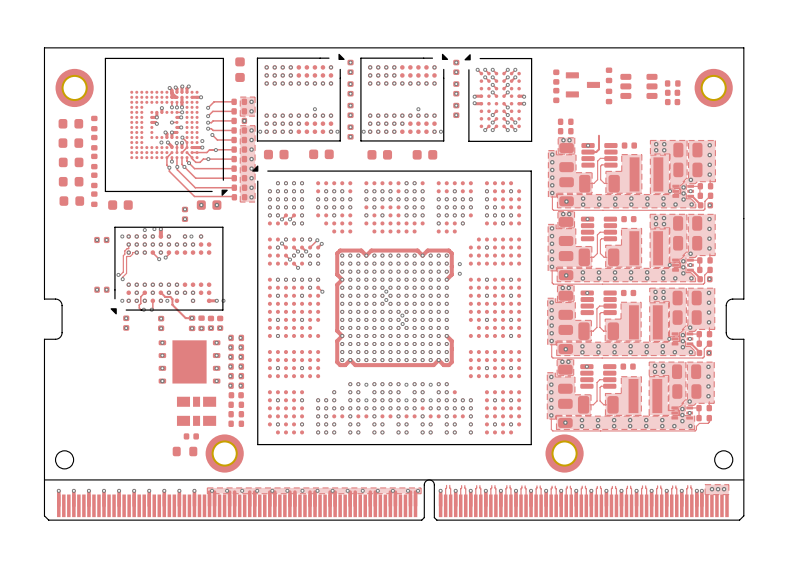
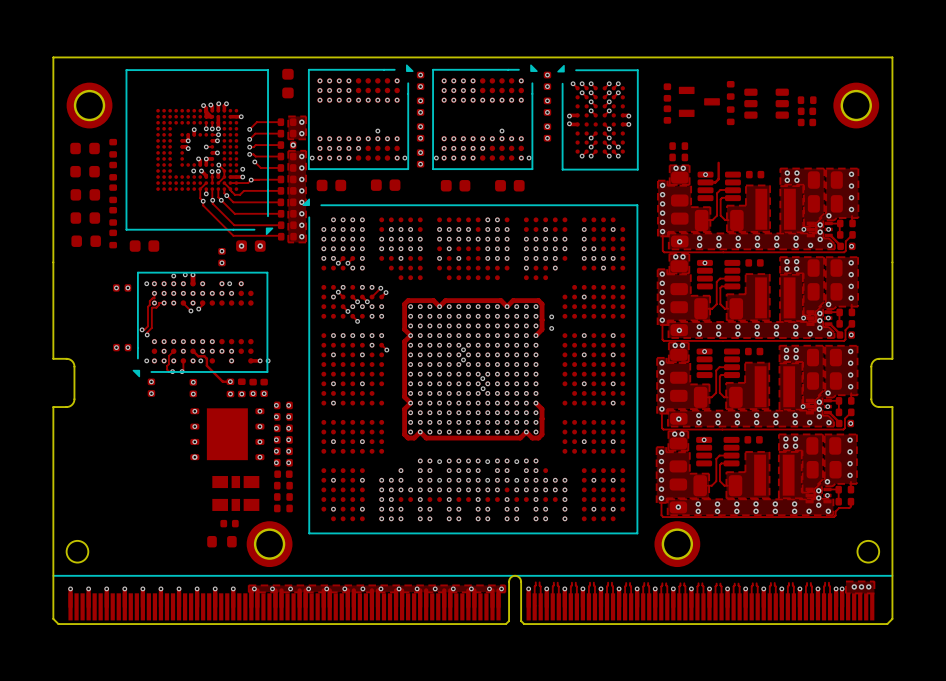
via: none -> (251, 180)
via: (215, 150) -> none
via: (208, 159) -> none

